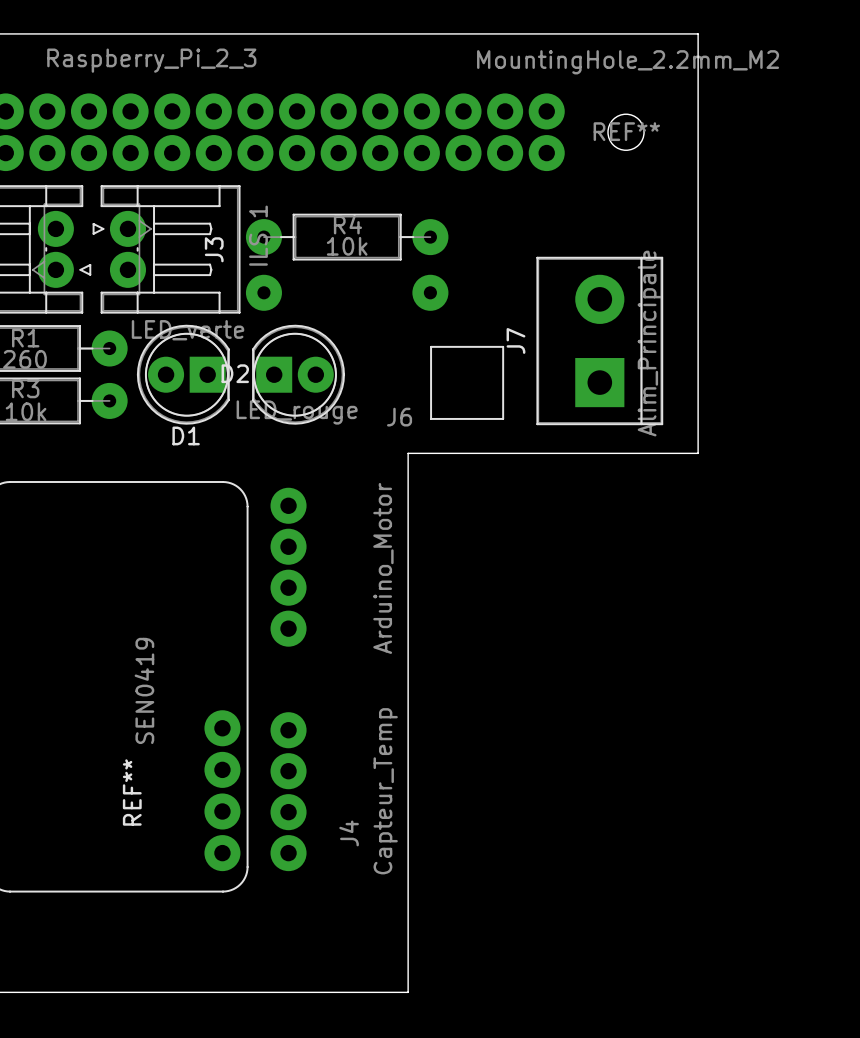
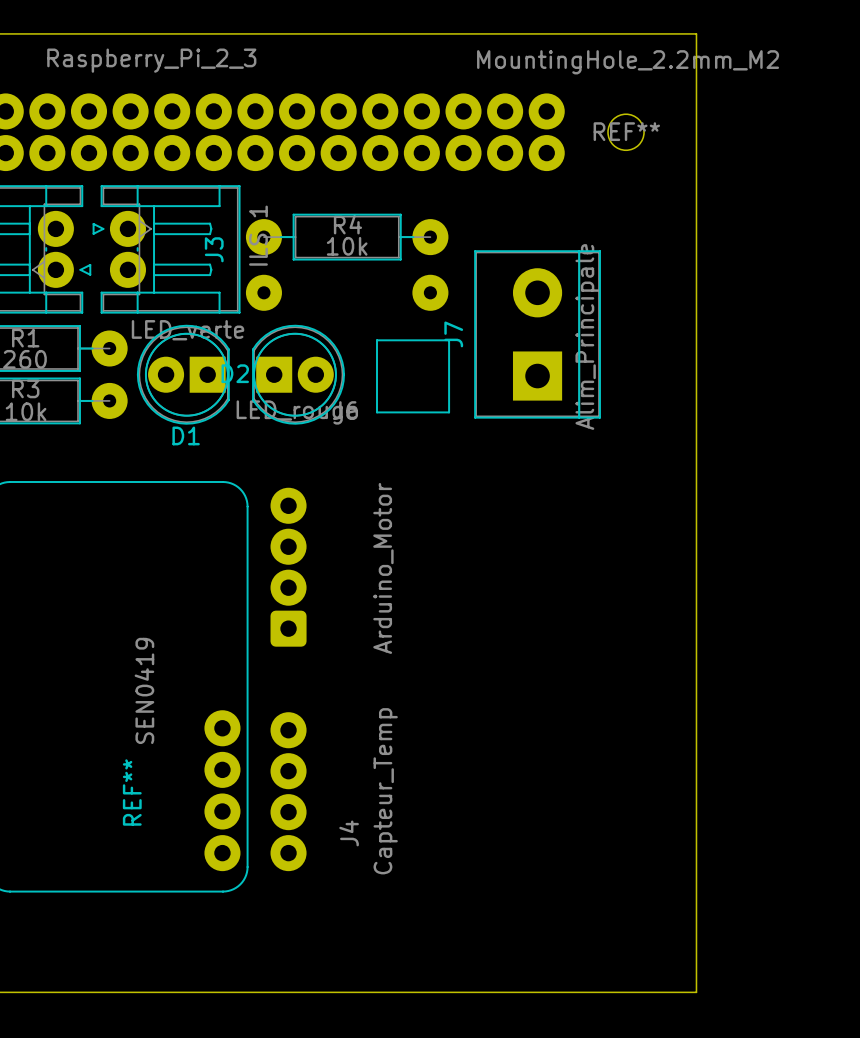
board edge: (696, 33) (698, 33) (698, 453) (408, 453) (408, 992) -> (696, 33) (696, 992) (408, 992)
J7 position: (599, 340) -> (537, 334)
J6 position: (467, 382) -> (413, 376)
part footprint: [270, 487, 307, 647] -> [270, 487, 307, 647]

